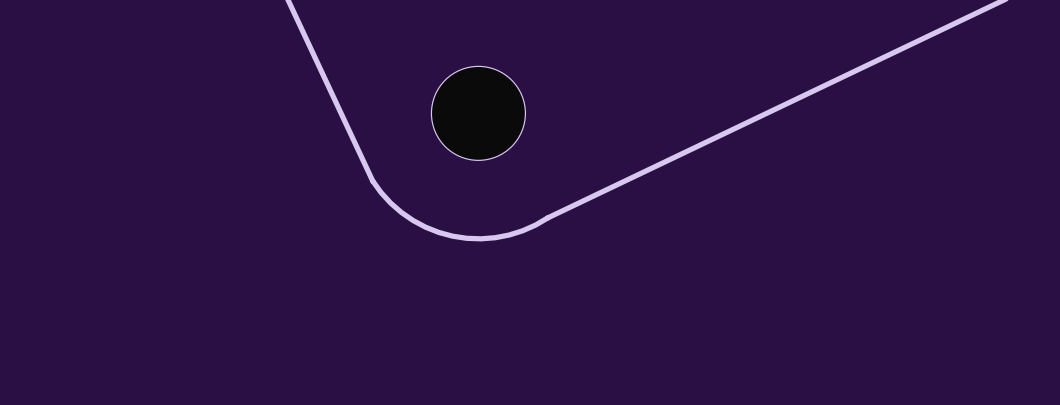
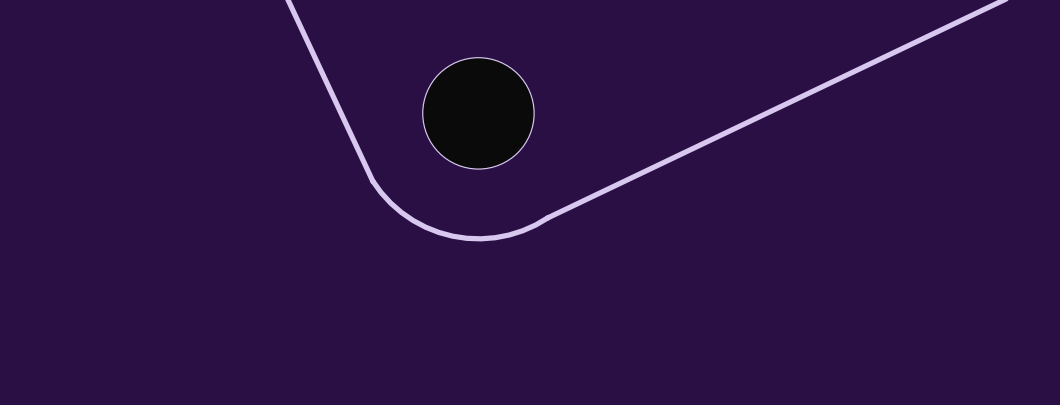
part footprint: [431, 66, 526, 161] -> [422, 57, 535, 170]

